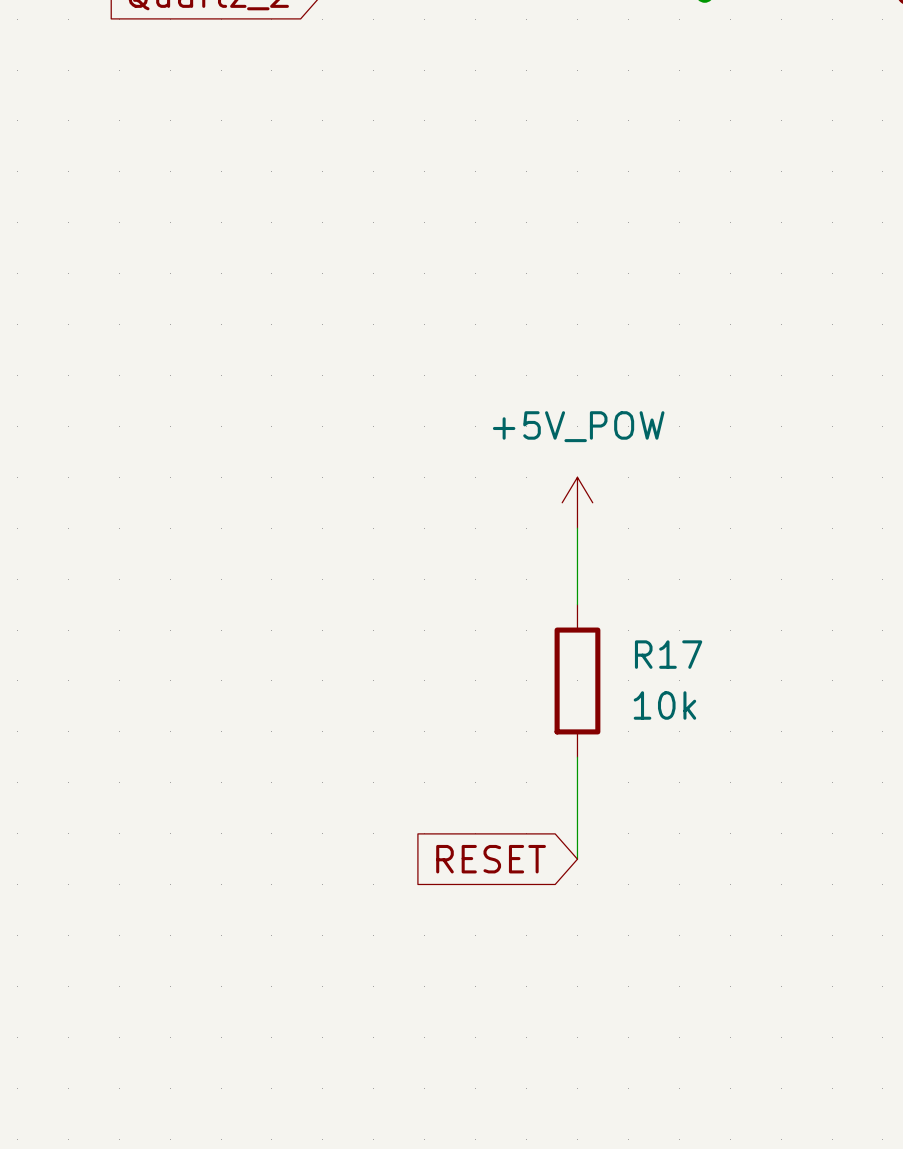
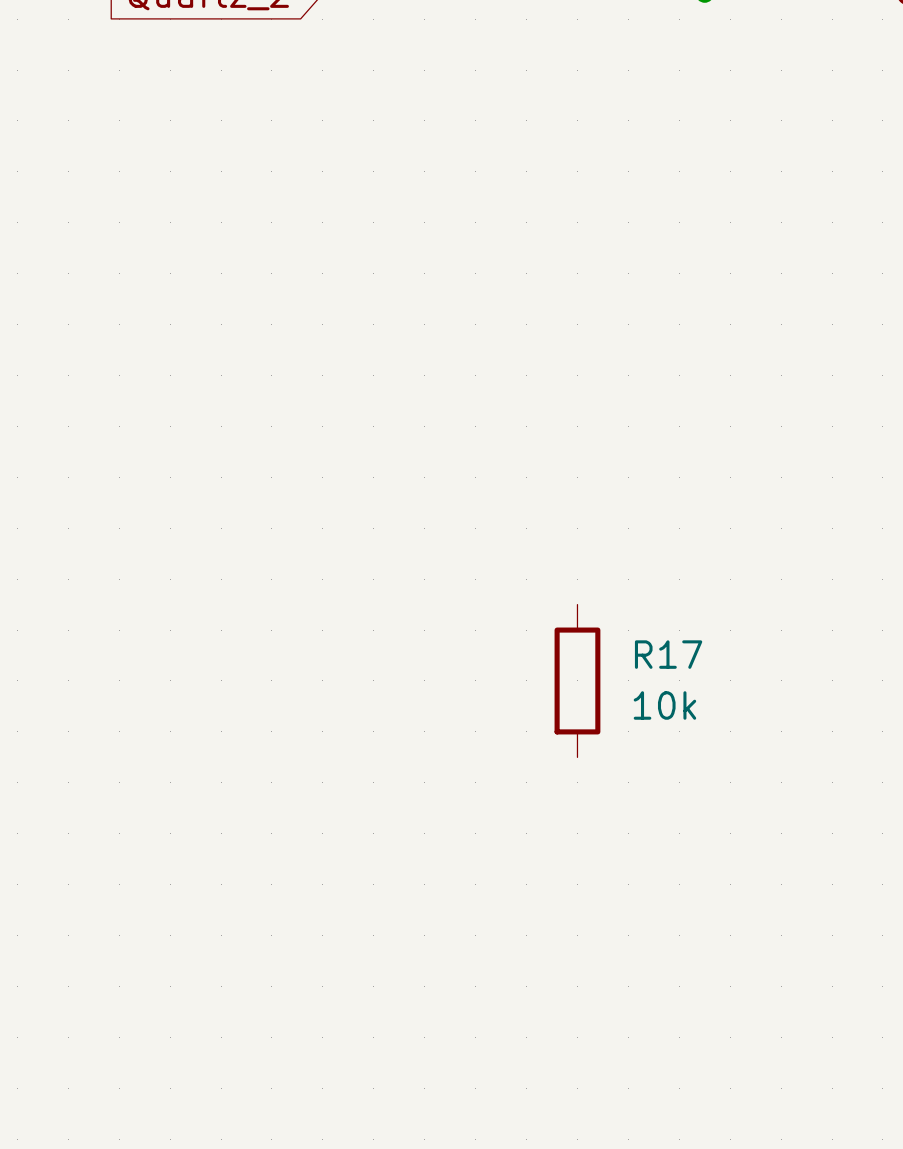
power symbol: +5V_POW (577, 502) -> none
wire: (577, 528) (577, 604) -> none
wire: (577, 757) (577, 859) -> none
global label: RESET (491, 859) -> none

